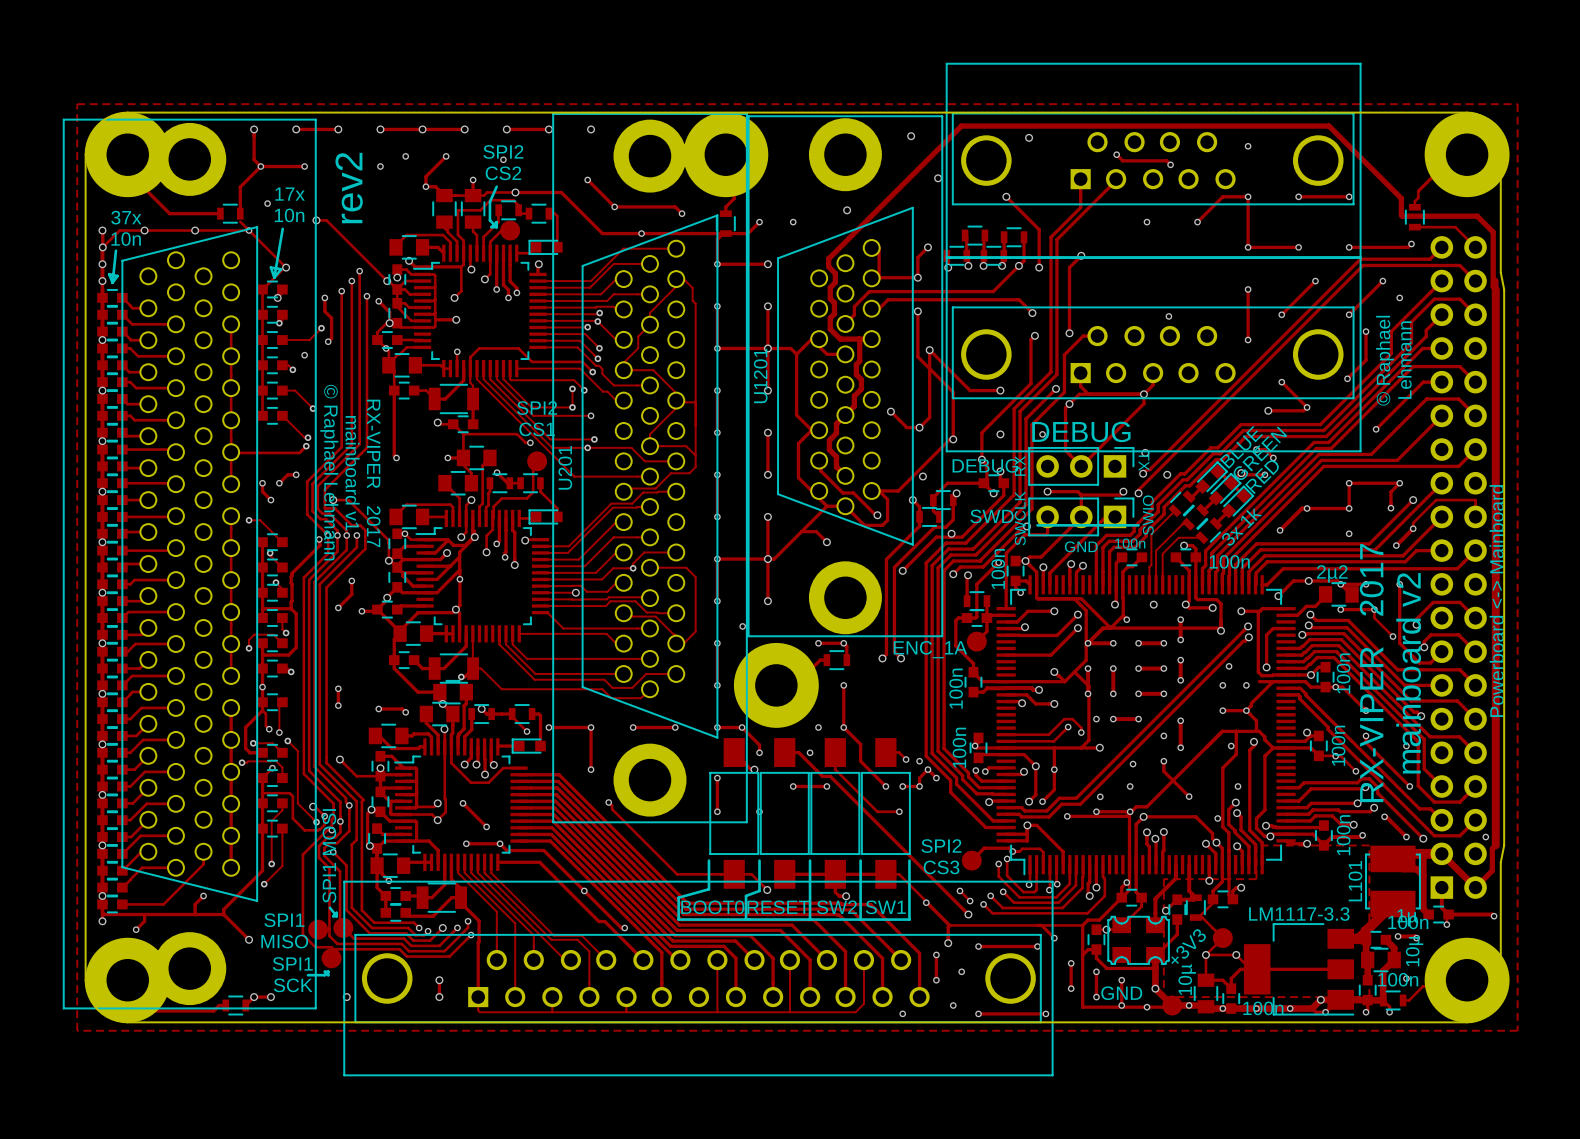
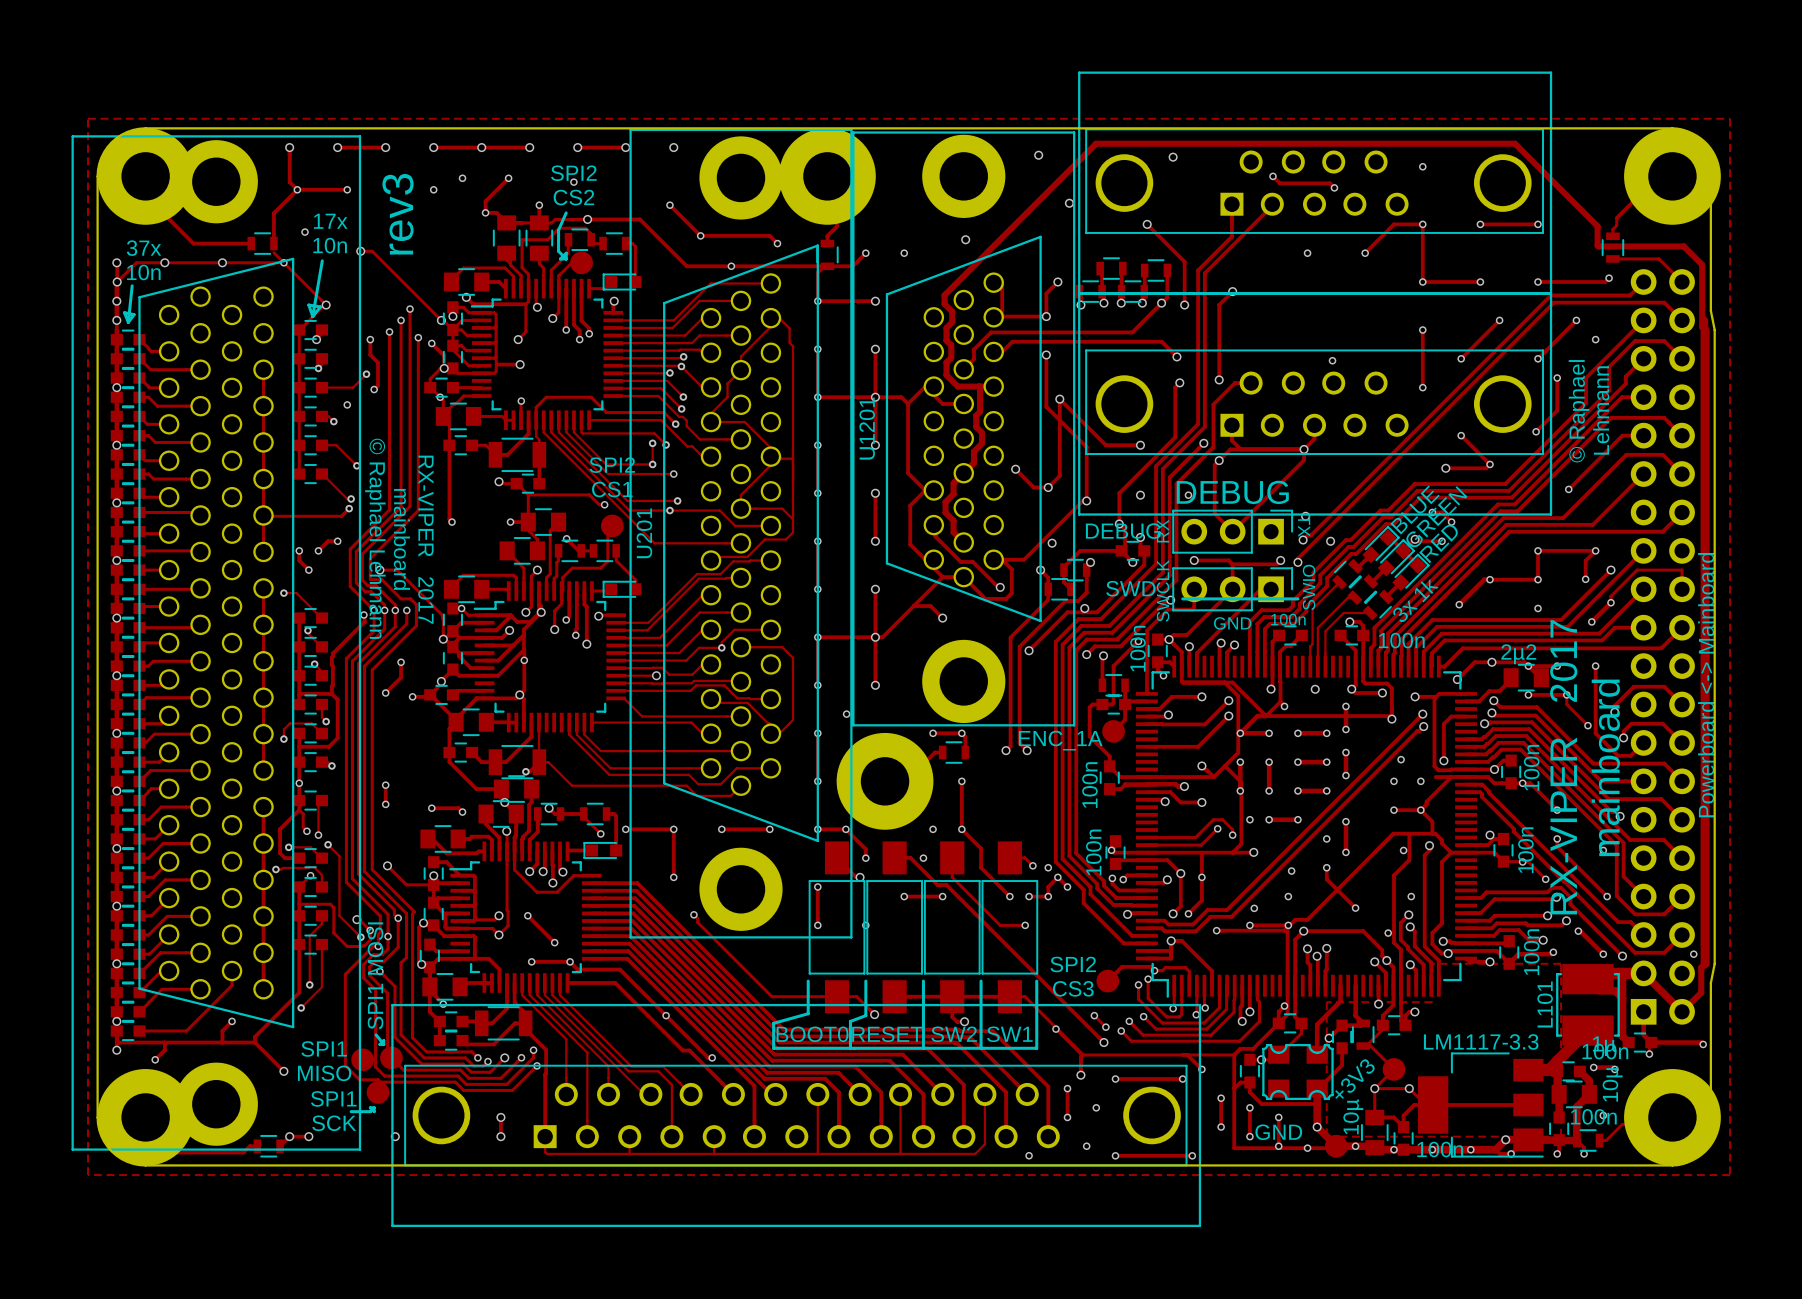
text: rev2 (349, 188) -> rev3 (397, 214)
text: mainboard v1 (352, 473) -> mainboard (401, 539)
text: mainboard v2 (1408, 673) -> mainboard (1605, 767)

